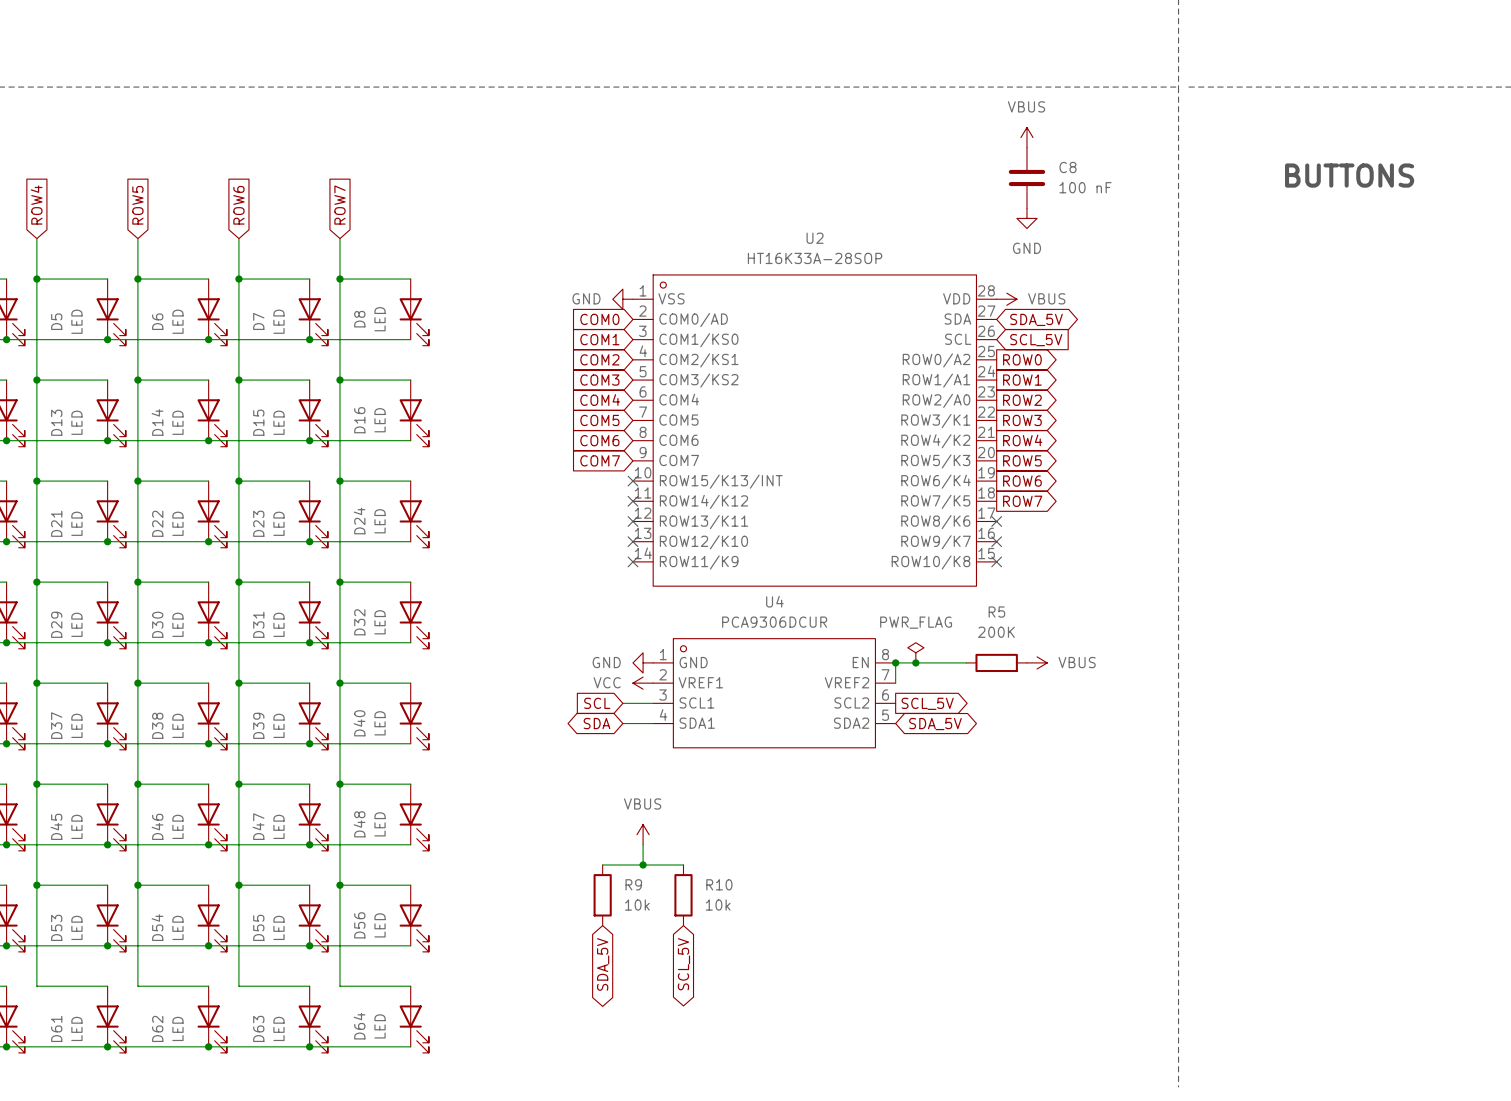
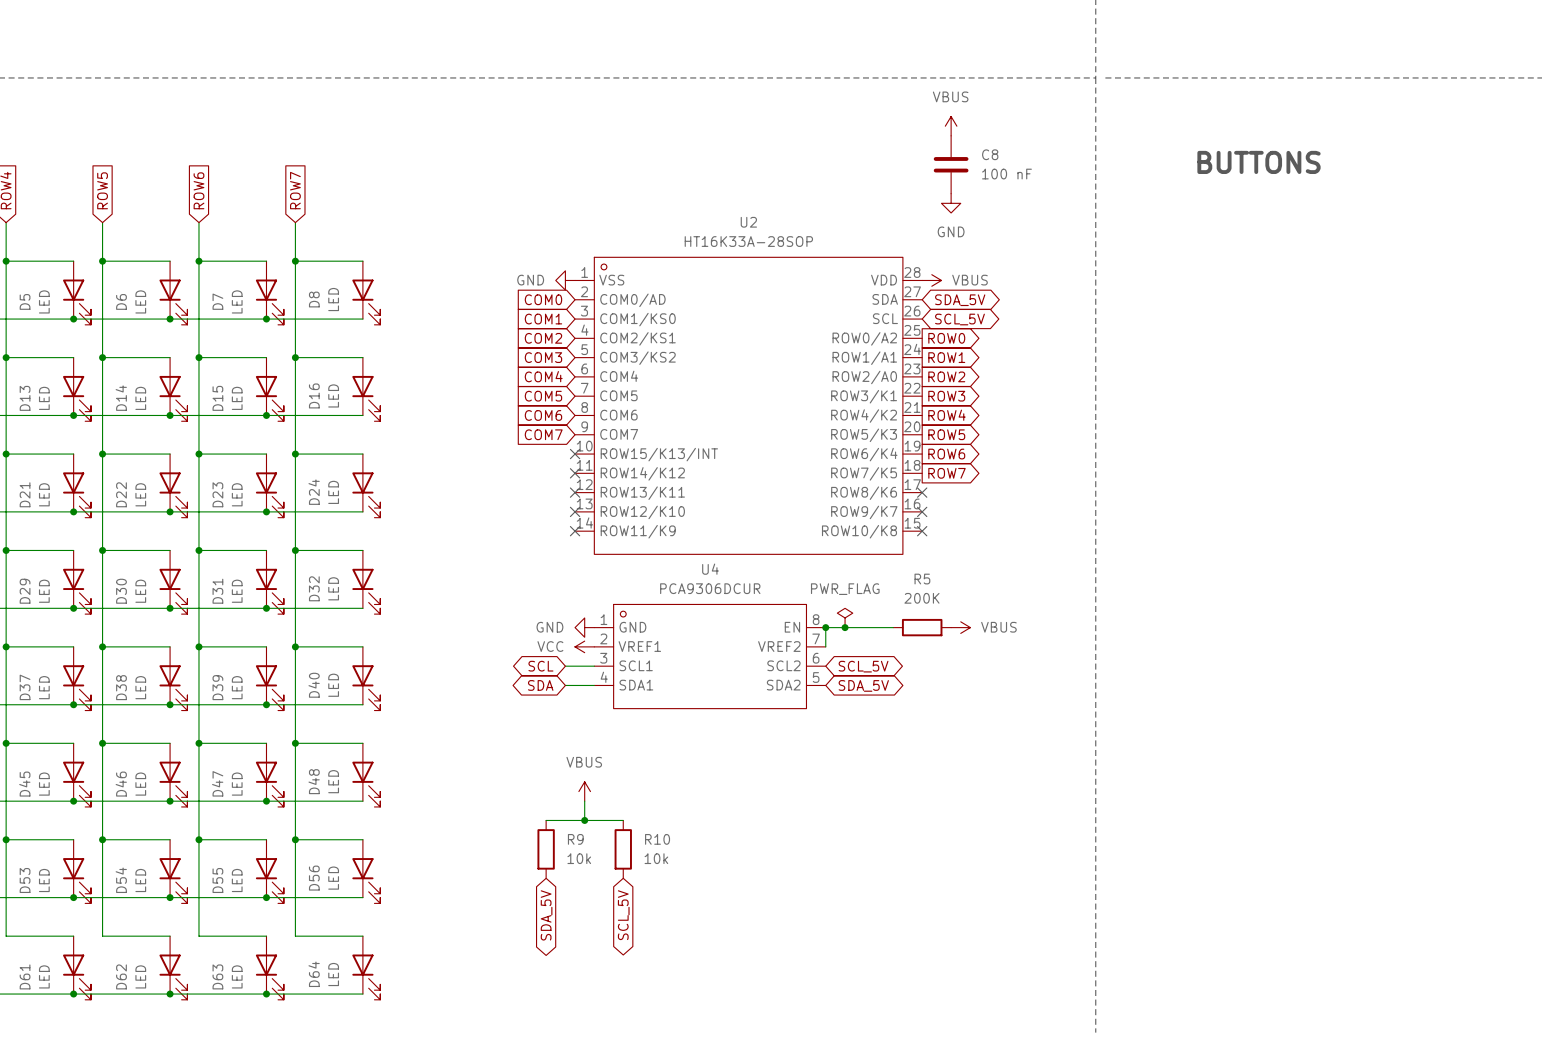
global label shape: input (1036, 340) -> bidirectional (959, 319)
global label shape: input (597, 703) -> bidirectional (540, 666)
global label shape: output (927, 703) -> bidirectional (863, 666)

